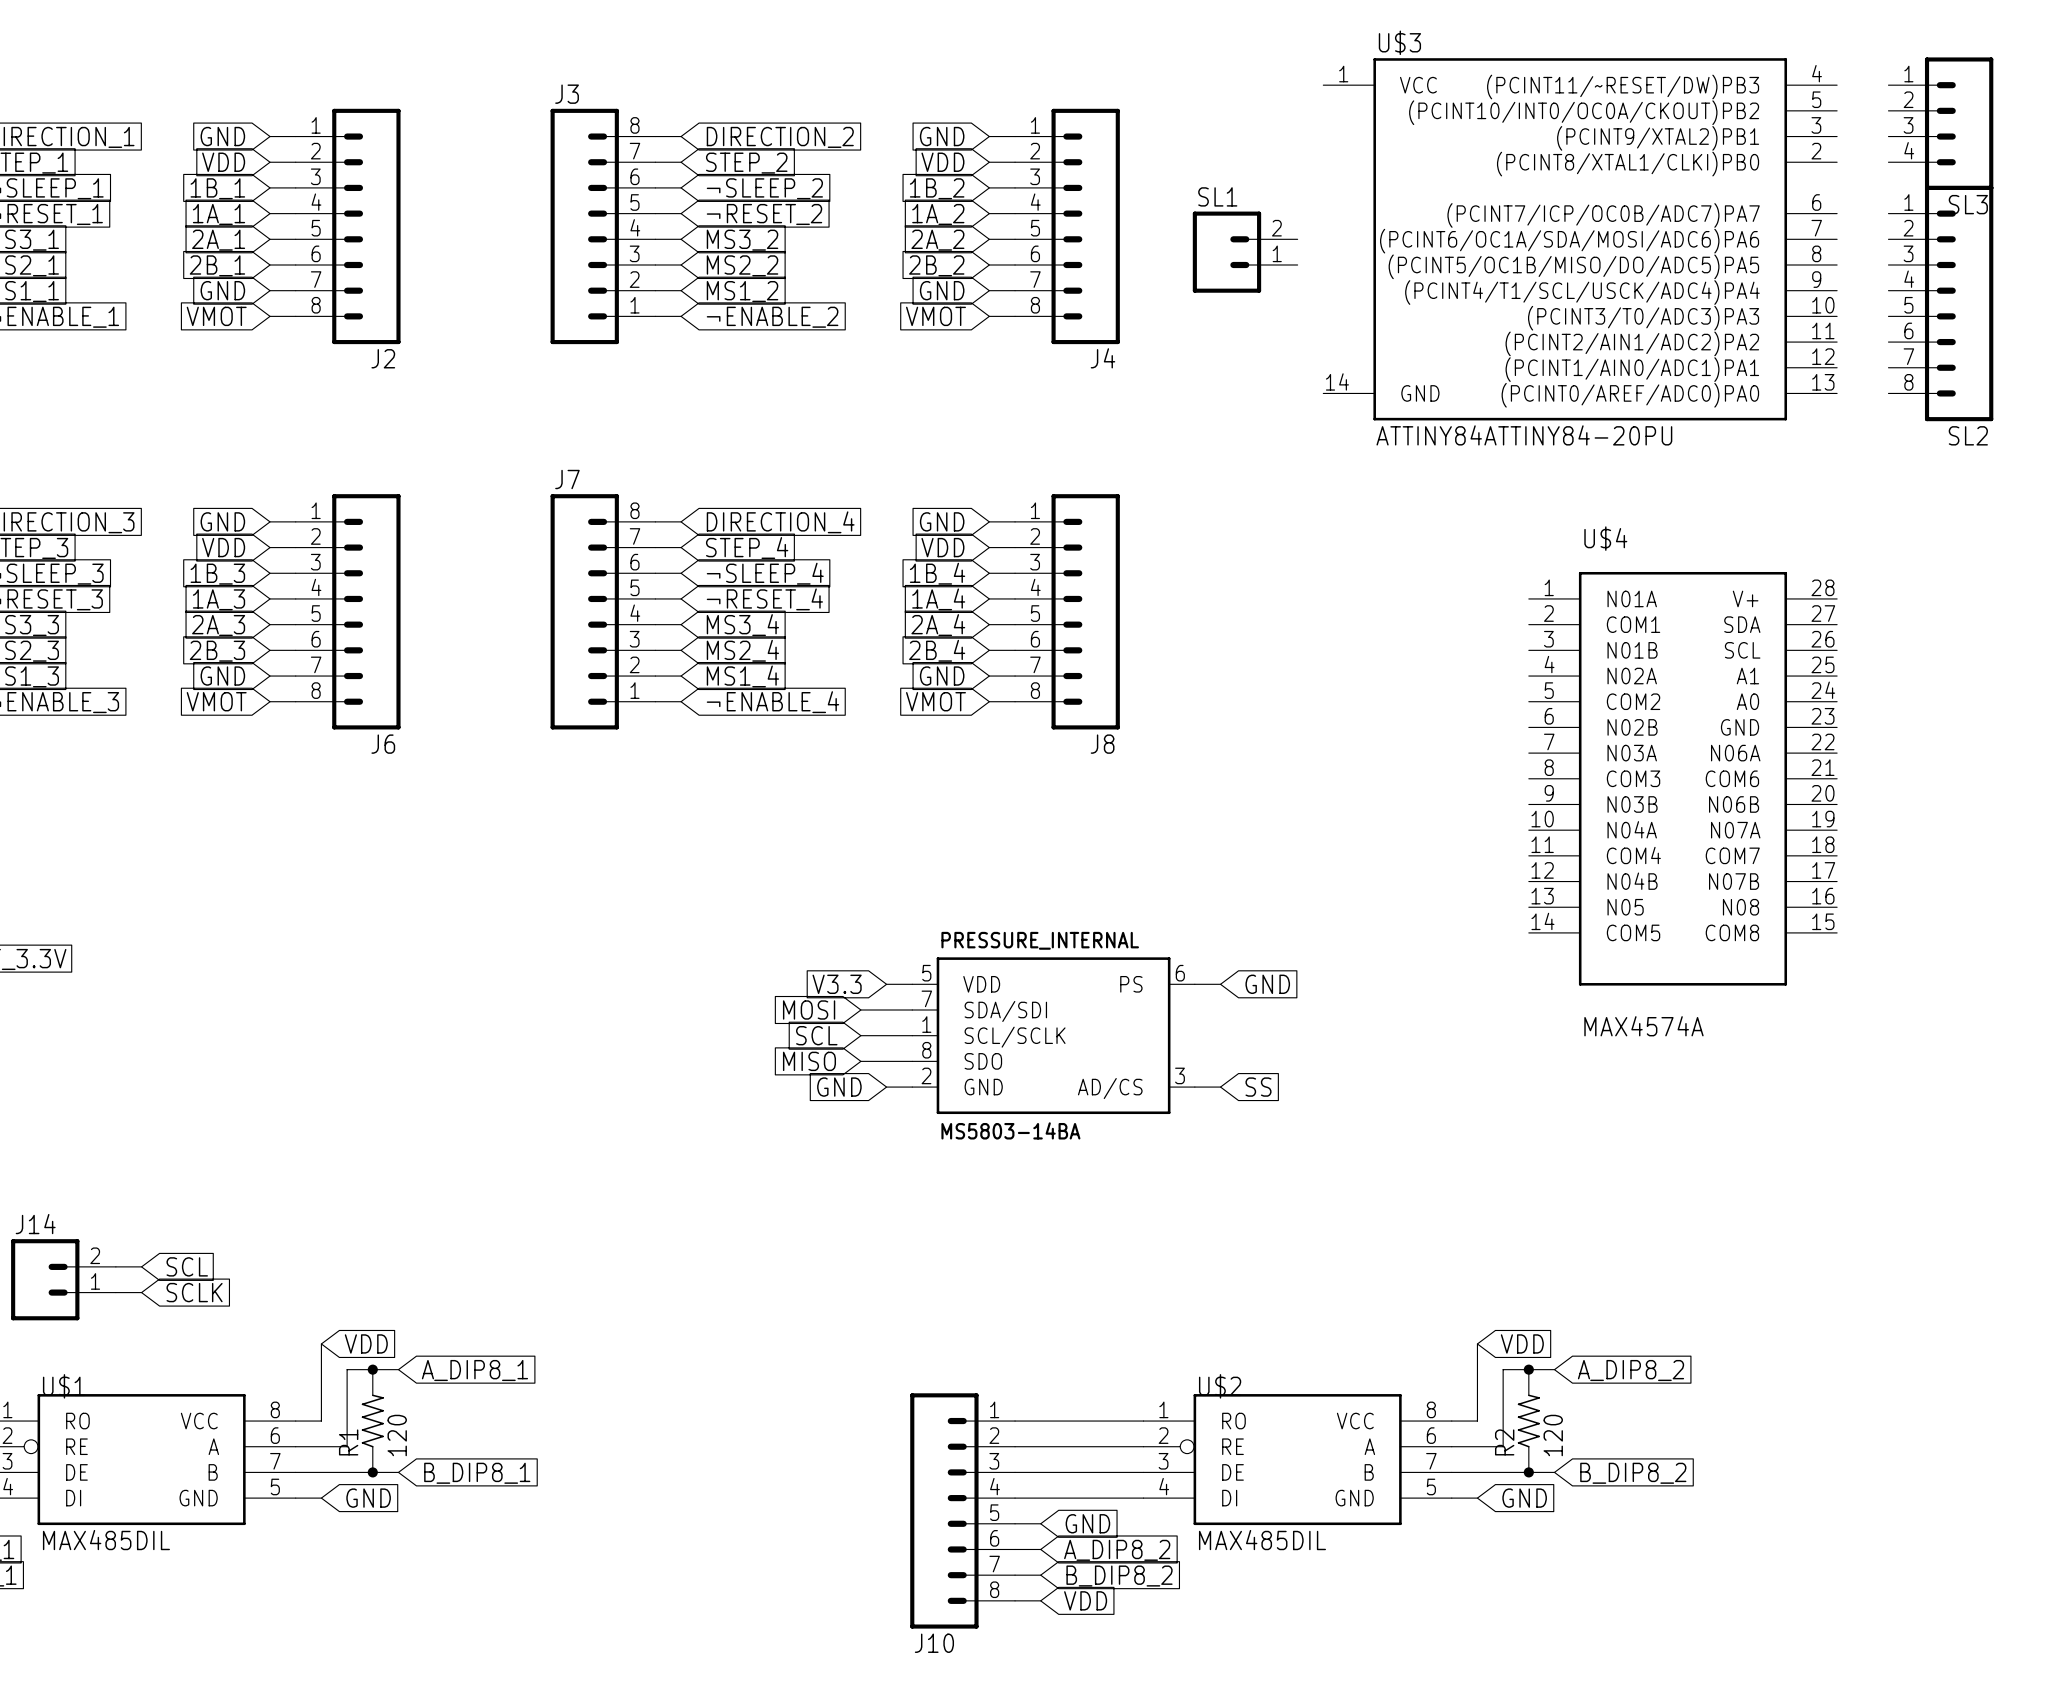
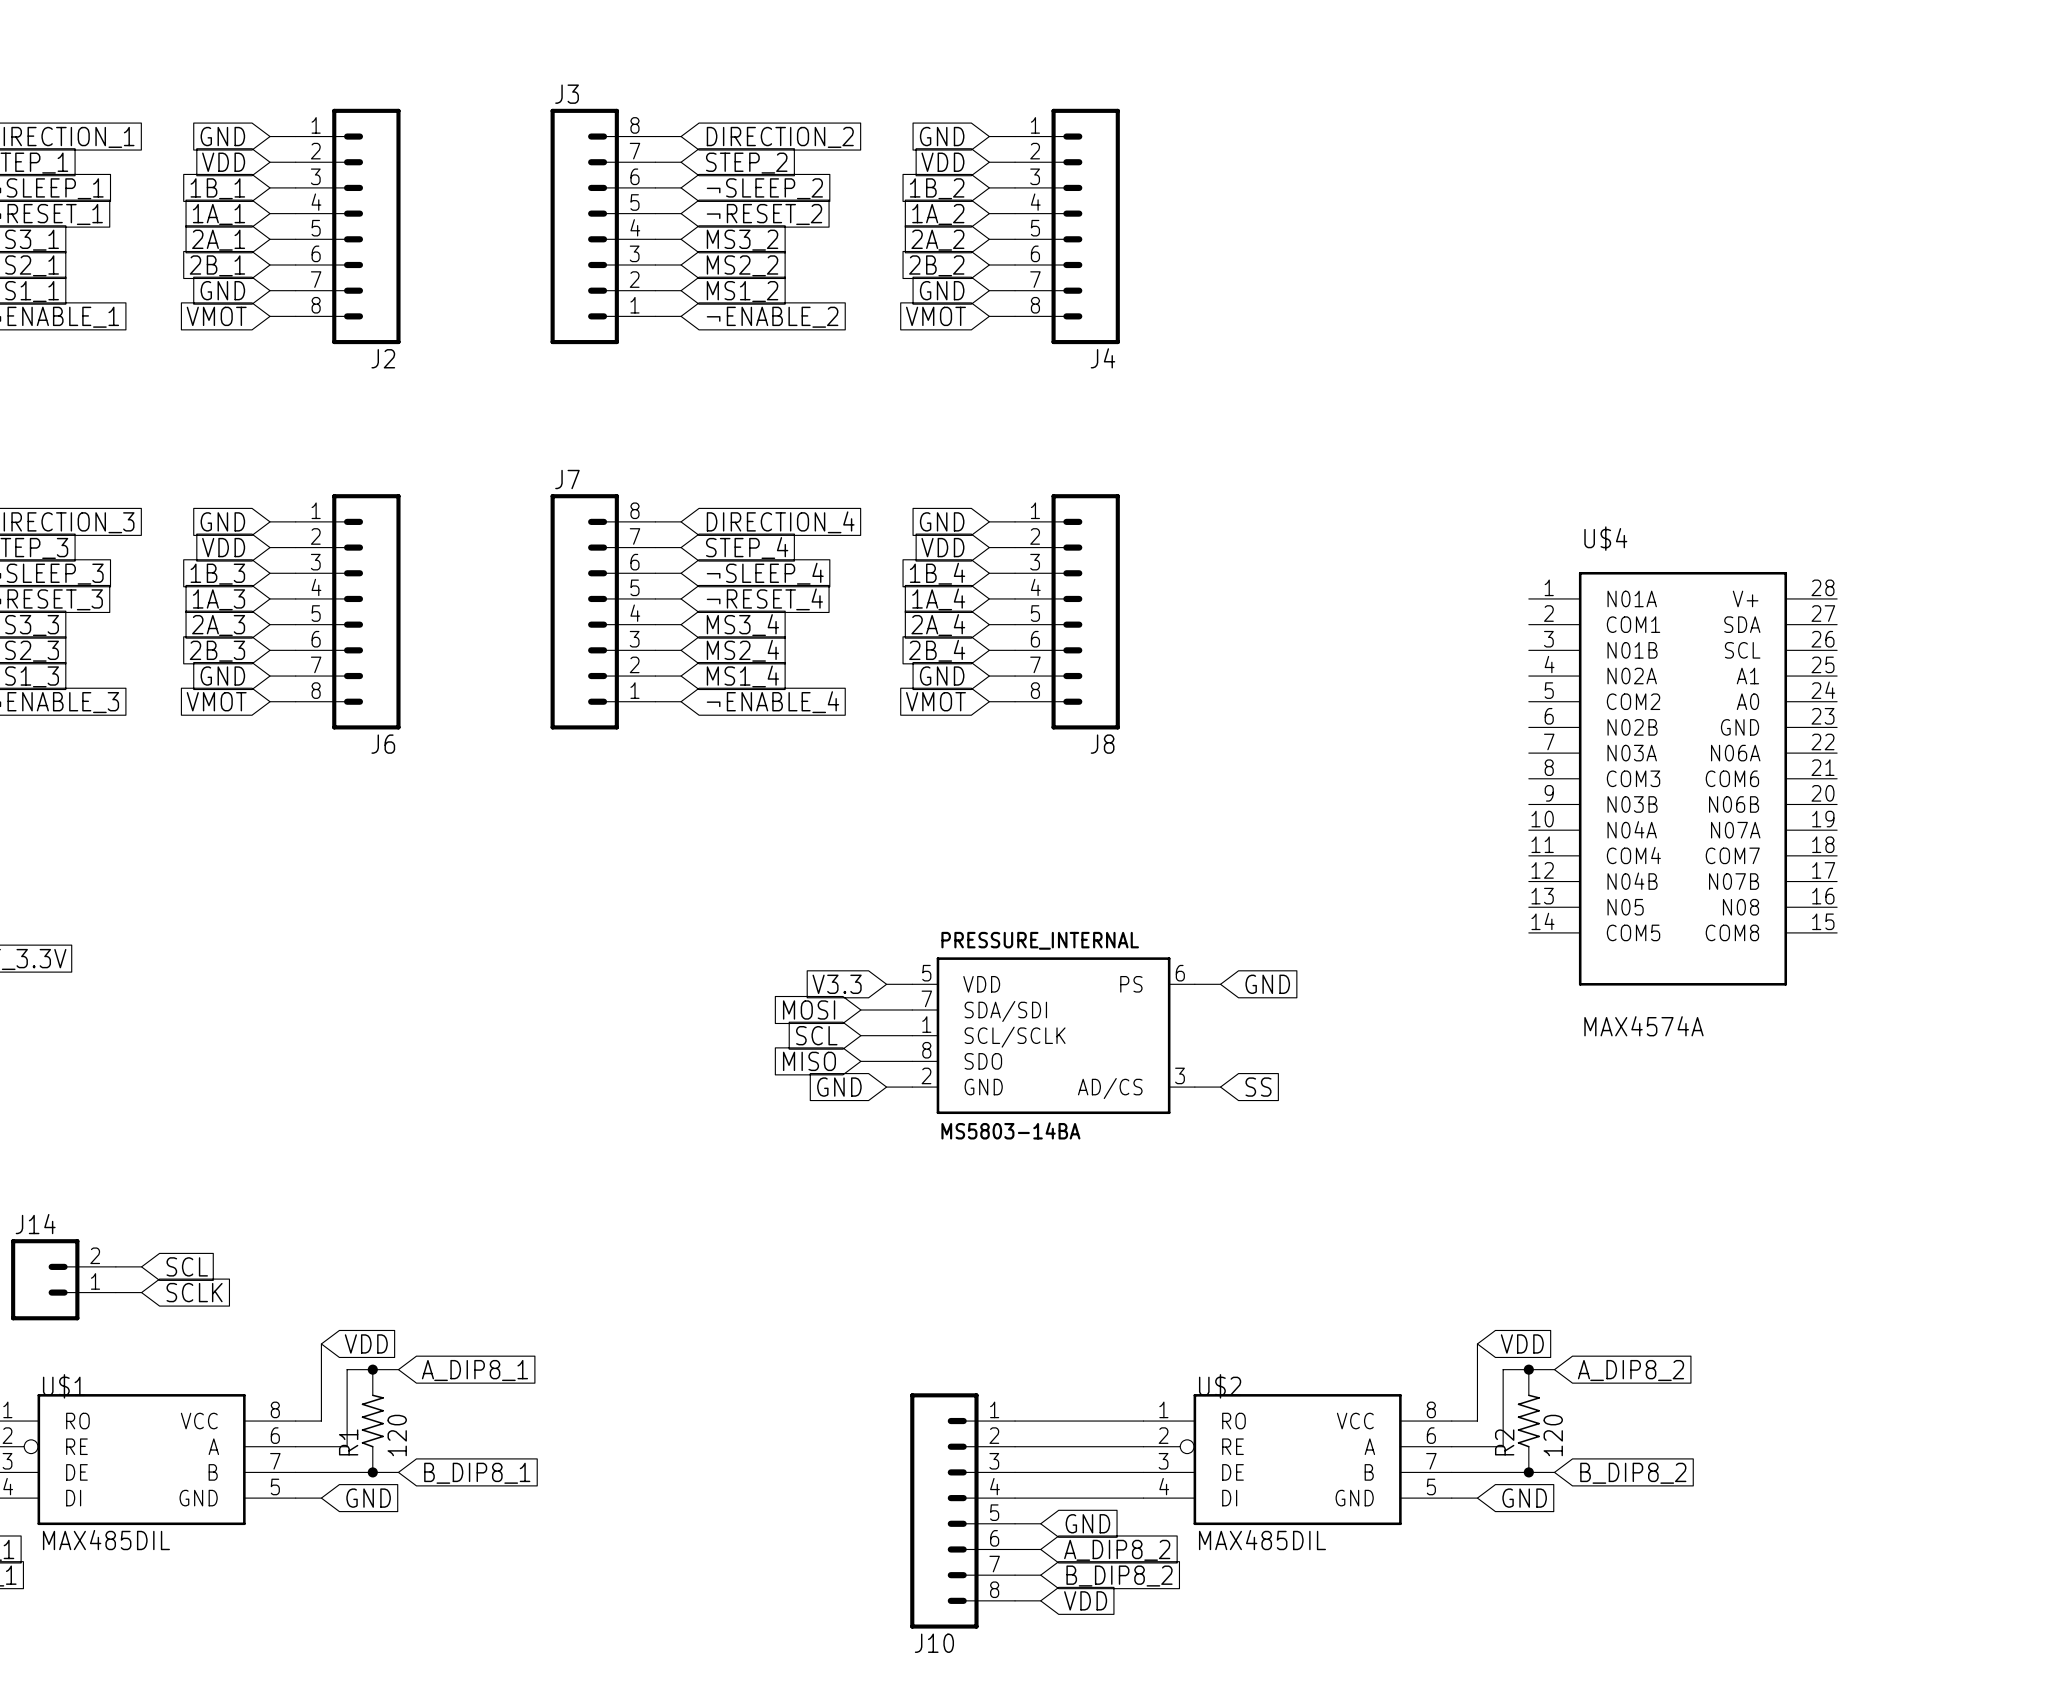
SL3: (1940, 123) -> none
U$3: ATTINY84ATTINY84-20PU (1580, 239) -> none
SL1: (1245, 252) -> none
SL2: (1940, 303) -> none

